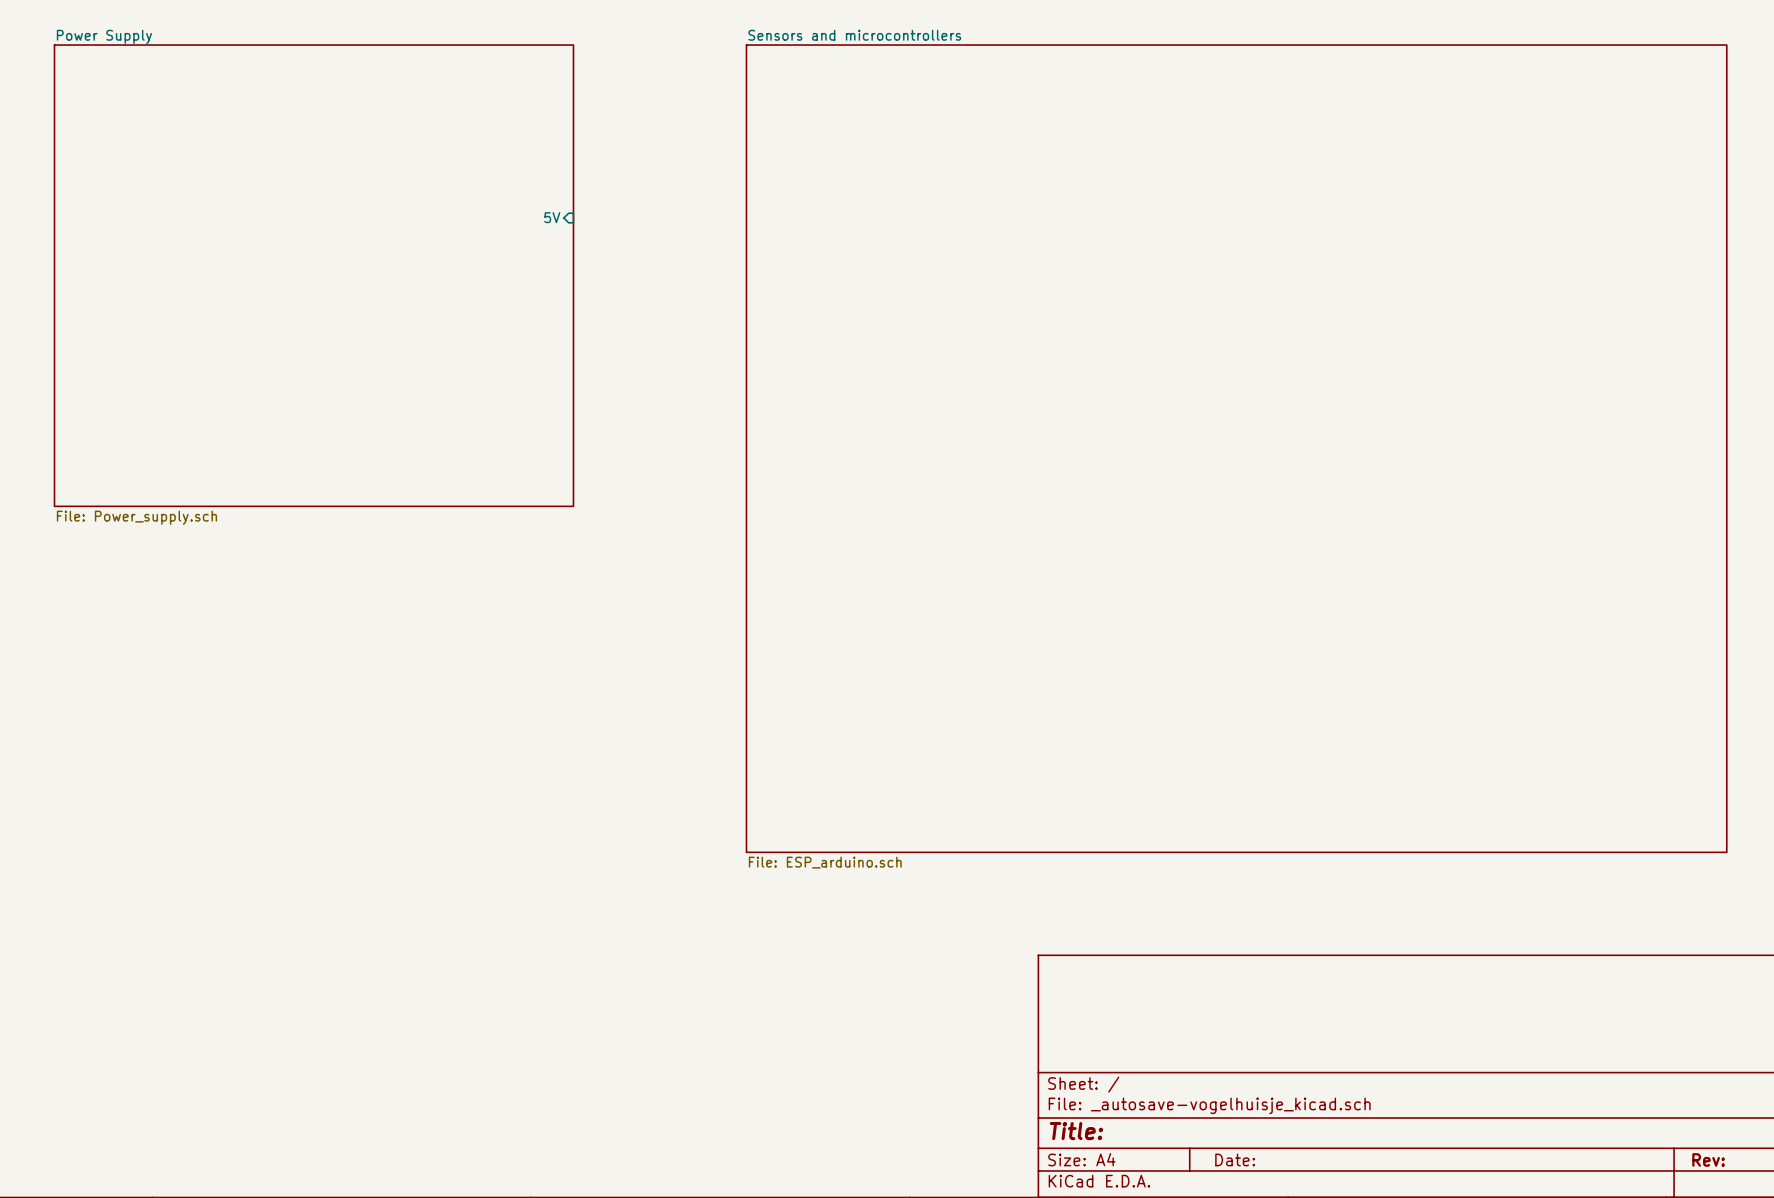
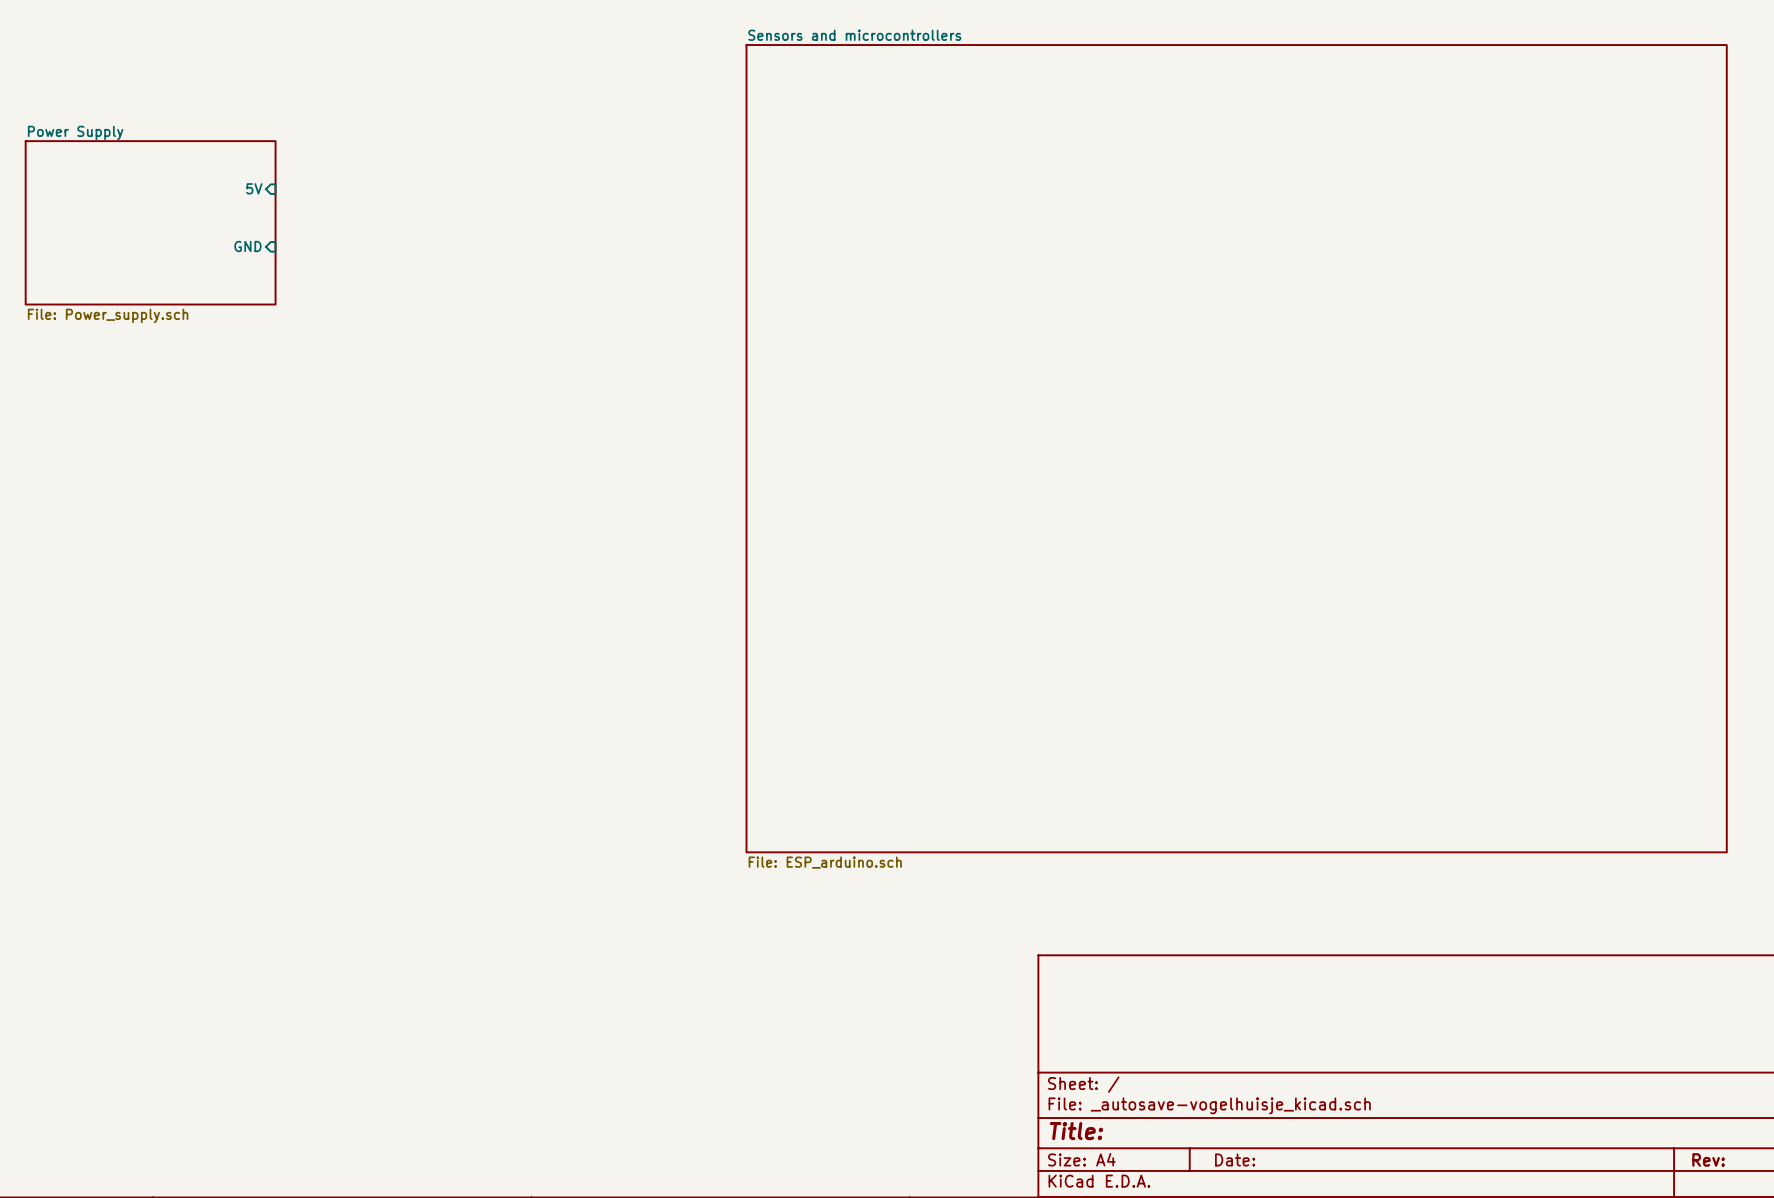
sheet pin: none -> 5V (254, 188)
sheet pin: 5V (552, 217) -> none
sheet Power Supply: none -> File: Power_supply.sch (150, 222)
sheet pin: none -> GND (247, 246)
sheet Power Supply: File: Power_supply.sch (313, 275) -> none

